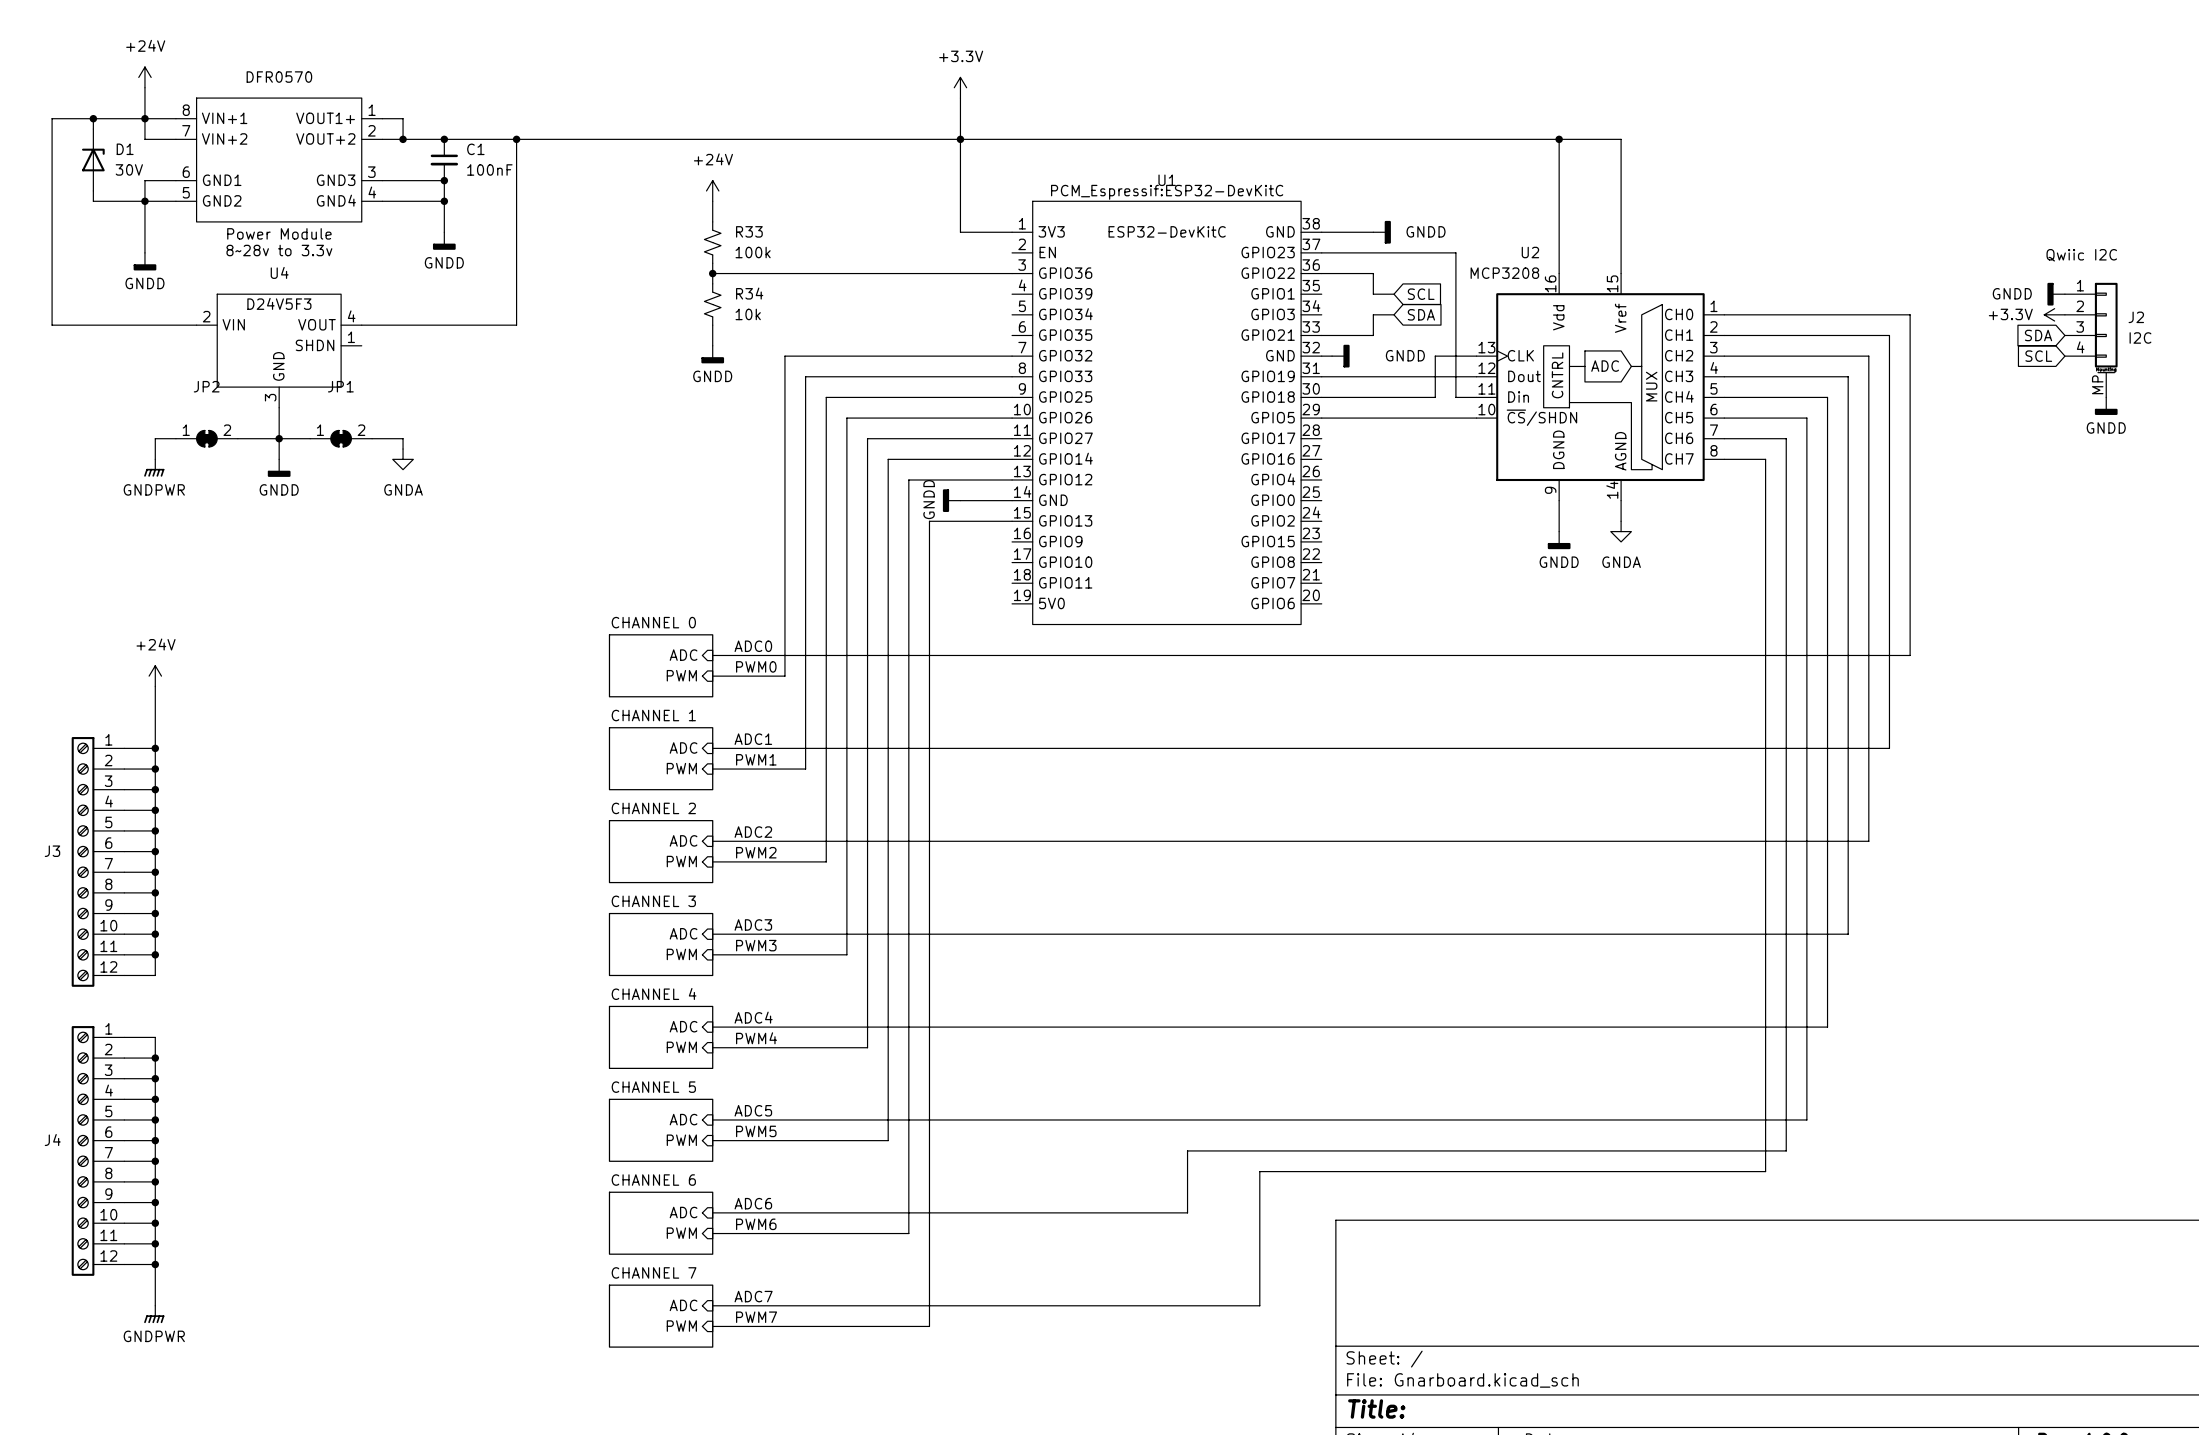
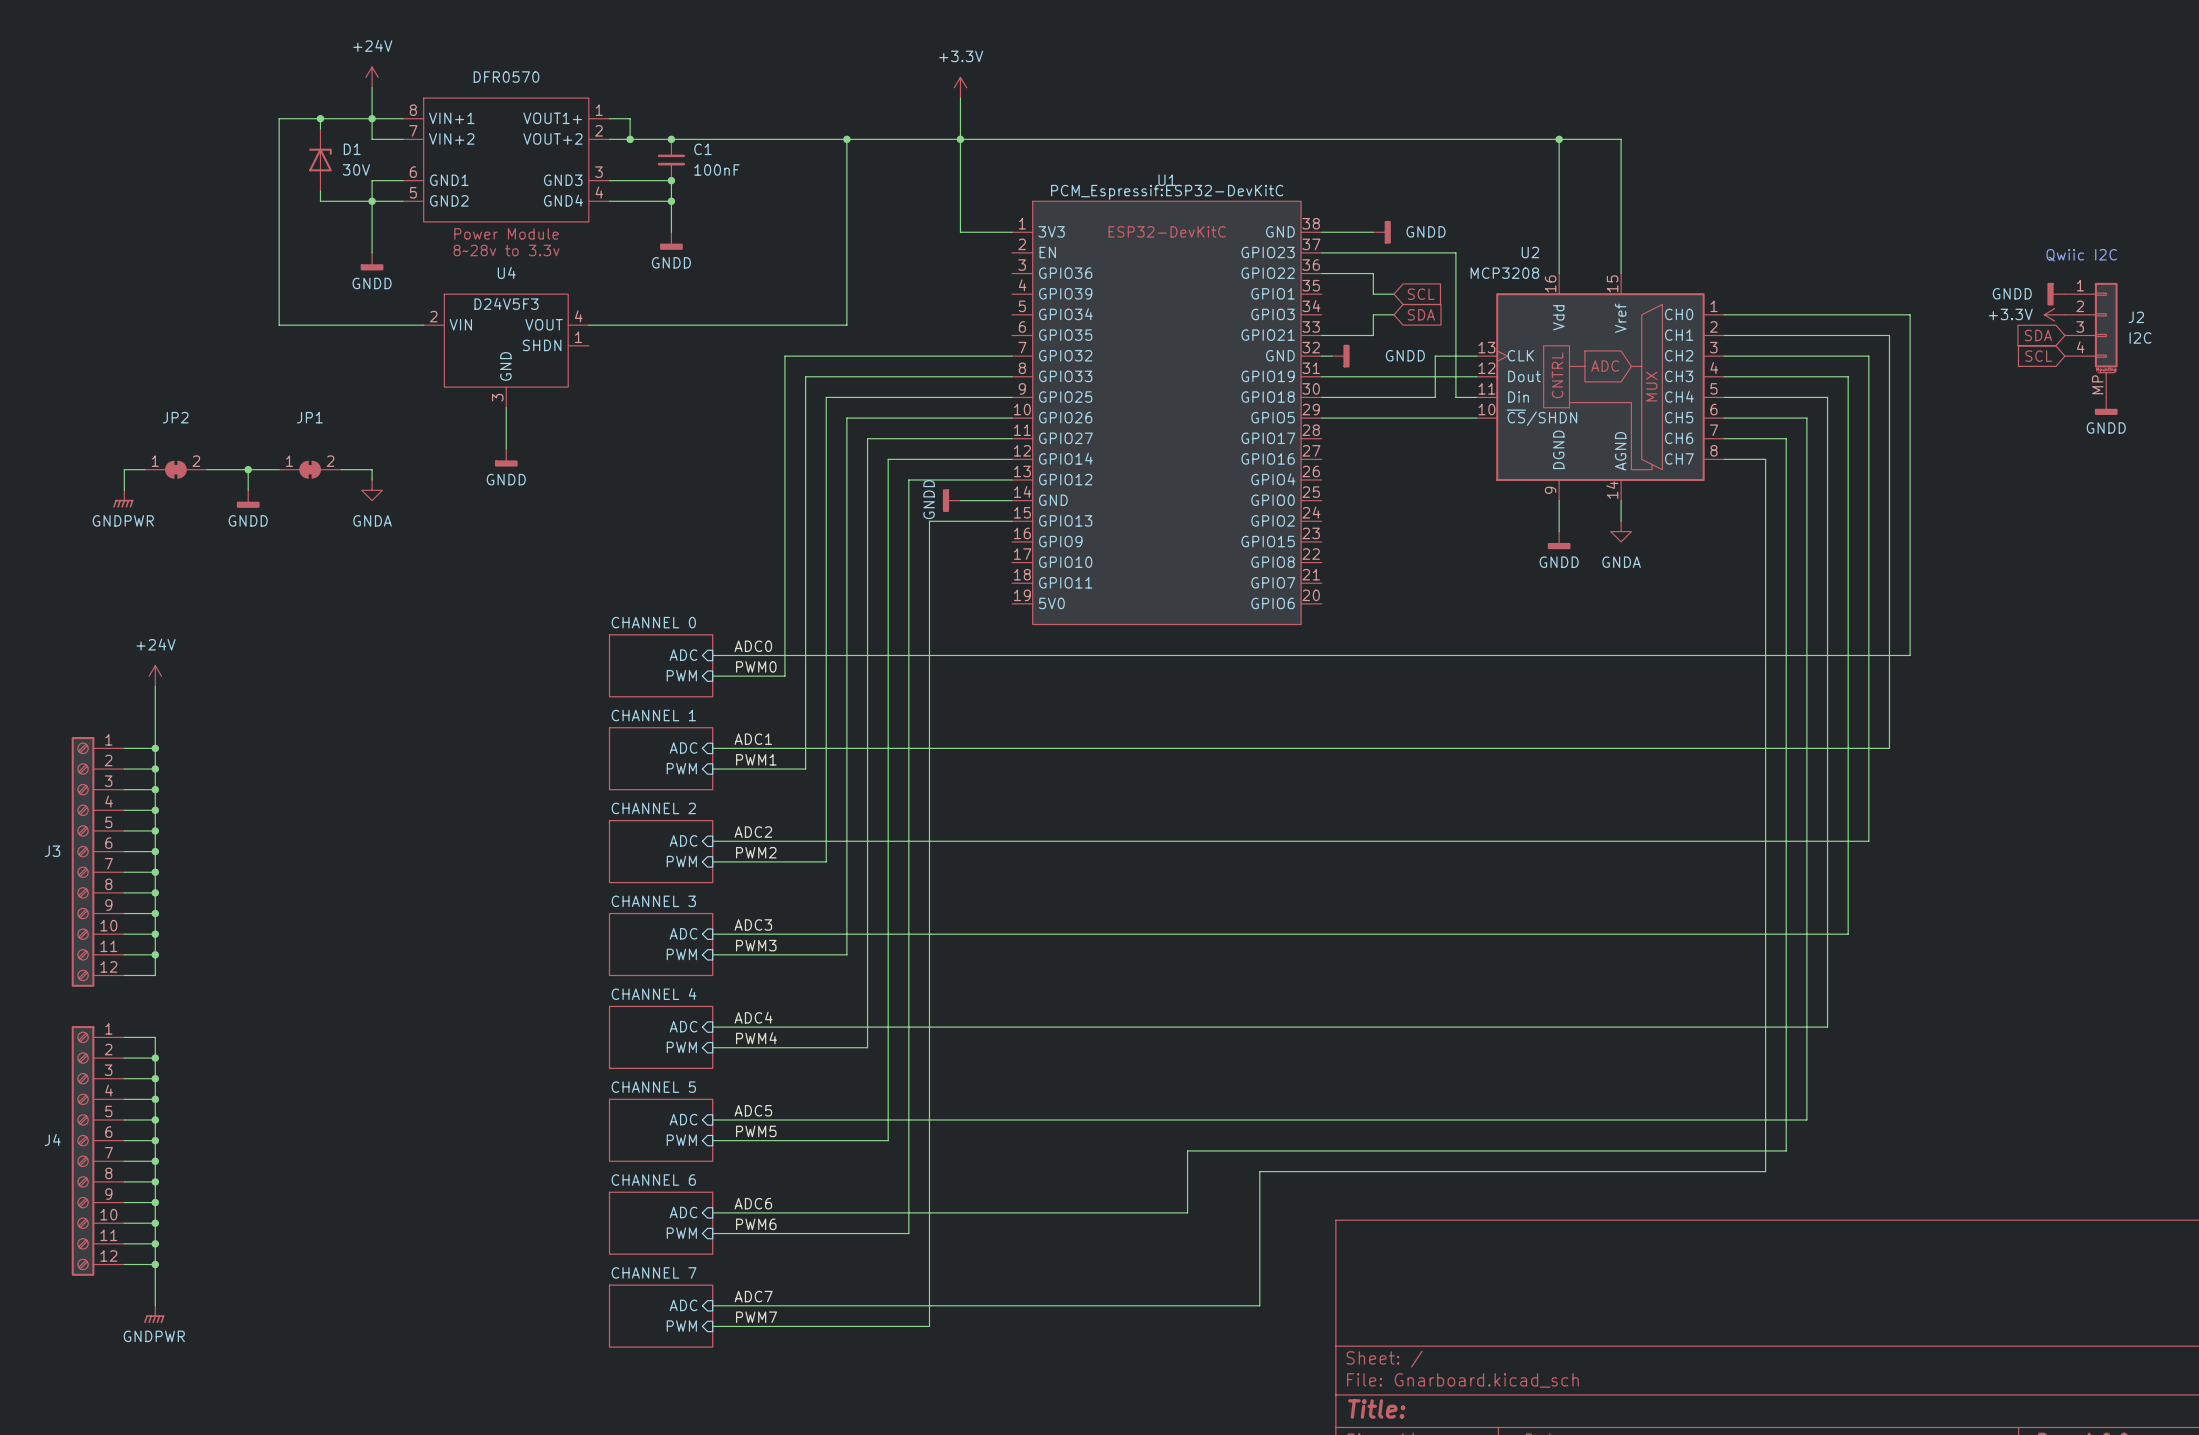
power symbol: +24V (144, 77) -> none
power symbol: none -> +24V (372, 77)
wire: (144, 87) (144, 139) (175, 139) -> none
wire: none -> (372, 87) (372, 139) (382, 139)
wire: (93, 118) (93, 129) -> none
junction: (93, 118) -> none
junction: (144, 118) -> none
wire: (175, 118) (52, 118) (52, 325) (196, 325) -> none
wire: none -> (320, 118) (320, 129)
junction: none -> (320, 118)
junction: none -> (372, 118)
wire: none -> (382, 118) (279, 118) (279, 325) (361, 325)
wire: (403, 118) (403, 139) (609, 139) -> none
wire: none -> (609, 118) (630, 118) (630, 139)
junction: (403, 139) -> none
junction: (444, 139) -> none
wire: (516, 139) (516, 325) (423, 325) -> none
junction: (516, 139) -> none
junction: none -> (630, 139)
junction: none -> (671, 139)
wire: none -> (846, 139) (846, 325) (588, 325)
junction: none -> (846, 139)
D1 position: (93, 160) -> (320, 160)
DFR0570 position: (279, 160) -> (506, 160)
C1 position: (444, 160) -> (671, 160)
wire: (175, 180) (144, 180) (144, 252) -> none
wire: none -> (382, 180) (372, 180) (372, 252)
wire: (403, 180) (444, 180) (444, 232) -> none
junction: (444, 180) -> none
wire: none -> (609, 180) (671, 180) (671, 232)
junction: none -> (671, 180)
wire: (93, 190) (93, 201) (175, 201) -> none
wire: none -> (320, 190) (320, 201) (382, 201)
power symbol: +24V (712, 190) -> none
junction: (144, 201) -> none
junction: none -> (372, 201)
junction: (444, 201) -> none
wire: none -> (609, 201) (671, 201)
junction: none -> (671, 201)
wire: (712, 201) (712, 221) -> none
power symbol position: GNDD (444, 241) -> GNDD (372, 261)
power symbol: none -> GNDD (671, 241)
R33: 100k (712, 242) -> none
power symbol: GNDD (144, 261) -> none
wire: (712, 263) (712, 283) -> none
wire: (712, 273) (1012, 273) -> none
junction: (712, 273) -> none
R34: 10k (712, 304) -> none
wire: (712, 325) (712, 345) -> none
U4 position: (279, 350) -> (506, 350)
power symbol: GNDD (712, 354) -> none
wire: (279, 407) (279, 459) -> none
wire: none -> (506, 407) (506, 449)
wire: (175, 438) (155, 438) (155, 459) -> (144, 469) (124, 469) (124, 490)
JP2 position: (206, 438) -> (175, 469)
wire: (237, 438) (310, 438) -> (206, 469) (279, 469)
junction position: (279, 438) -> (248, 469)
JP1 position: (341, 438) -> (310, 469)
wire: (372, 438) (403, 438) (403, 449) -> (341, 469) (372, 469) (372, 479)
power symbol: none -> GNDD (506, 457)
power symbol position: GNDA (403, 459) -> GNDA (372, 490)
power symbol position: GNDPWR (154, 468) -> GNDPWR (123, 498)
power symbol position: GNDD (279, 468) -> GNDD (248, 499)
wire: none -> (248, 469) (248, 490)

